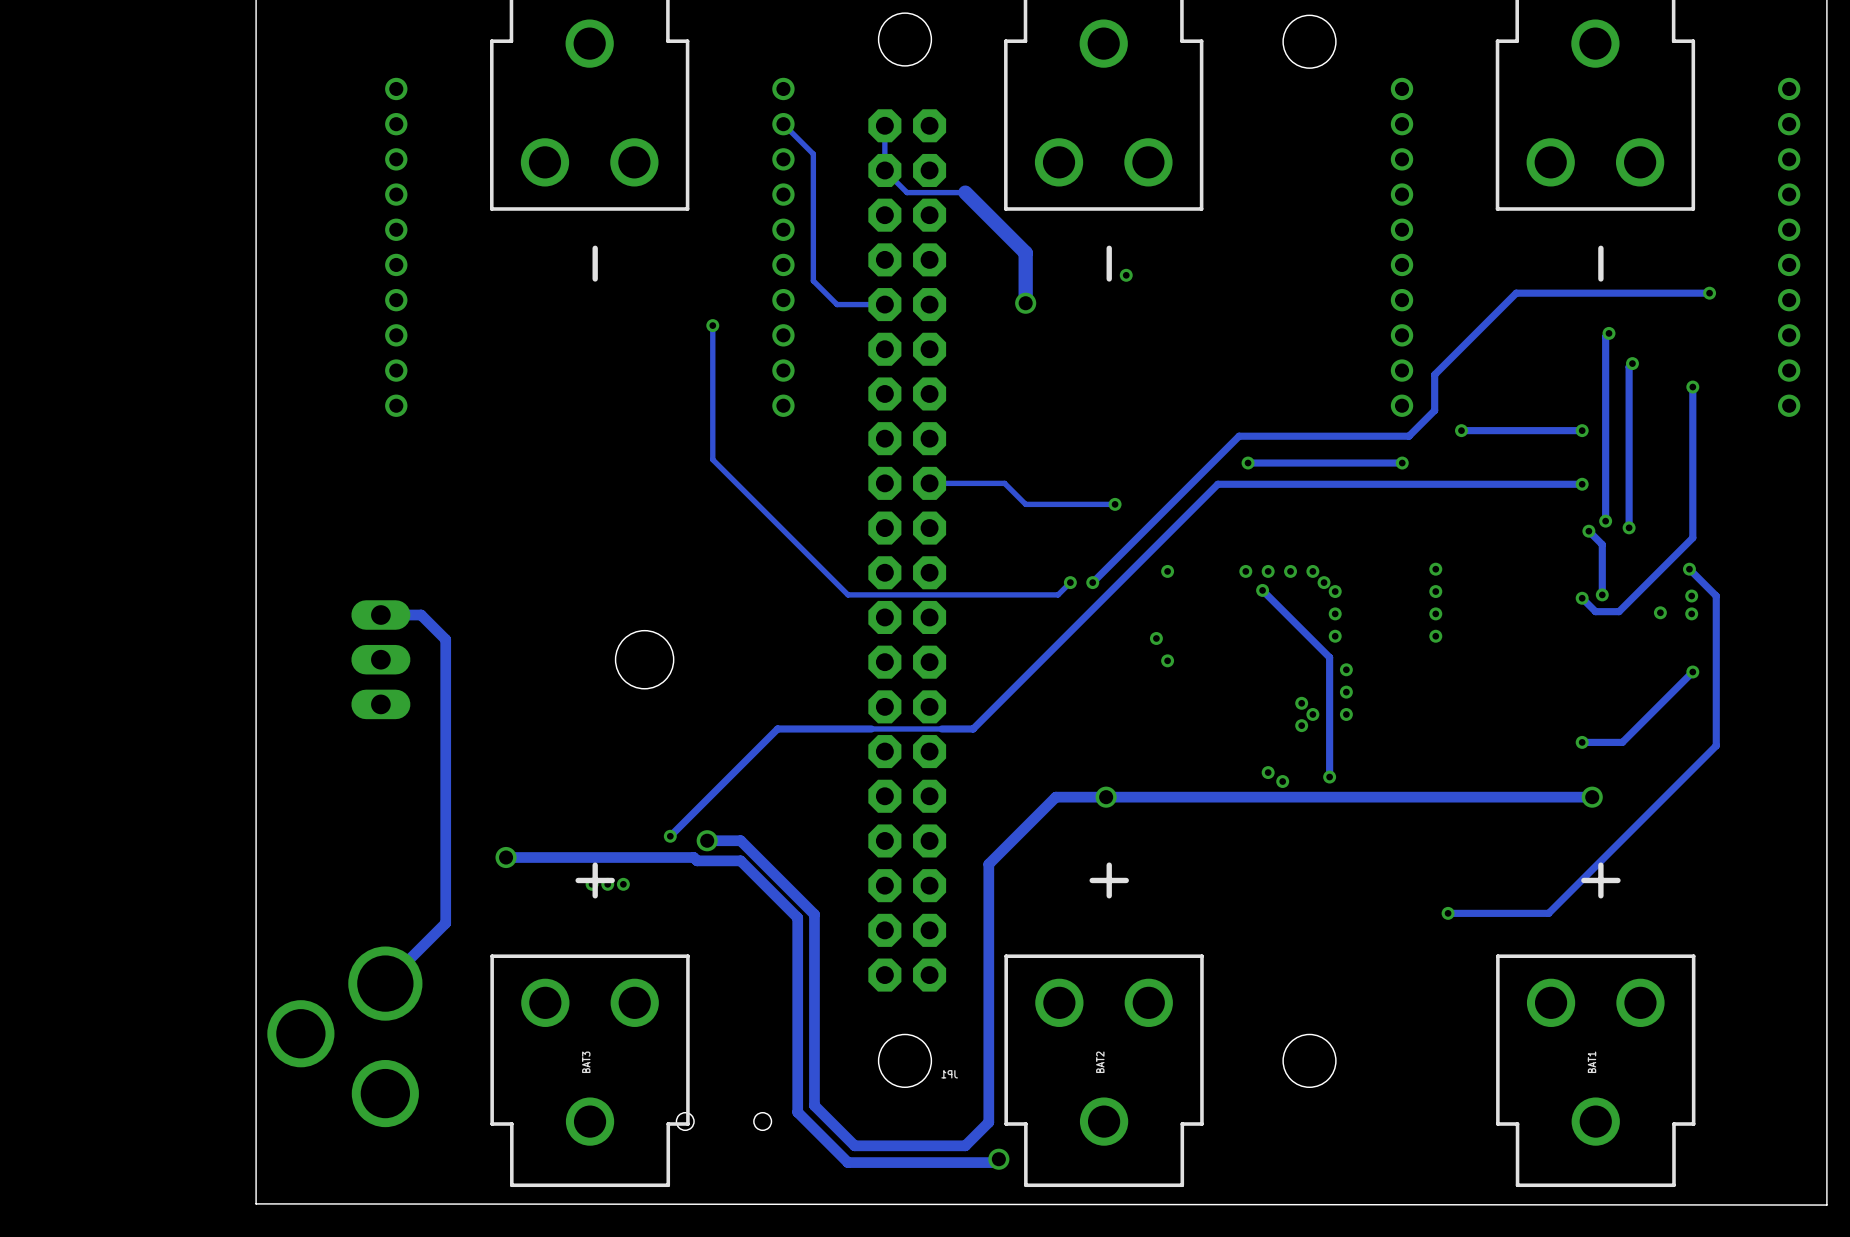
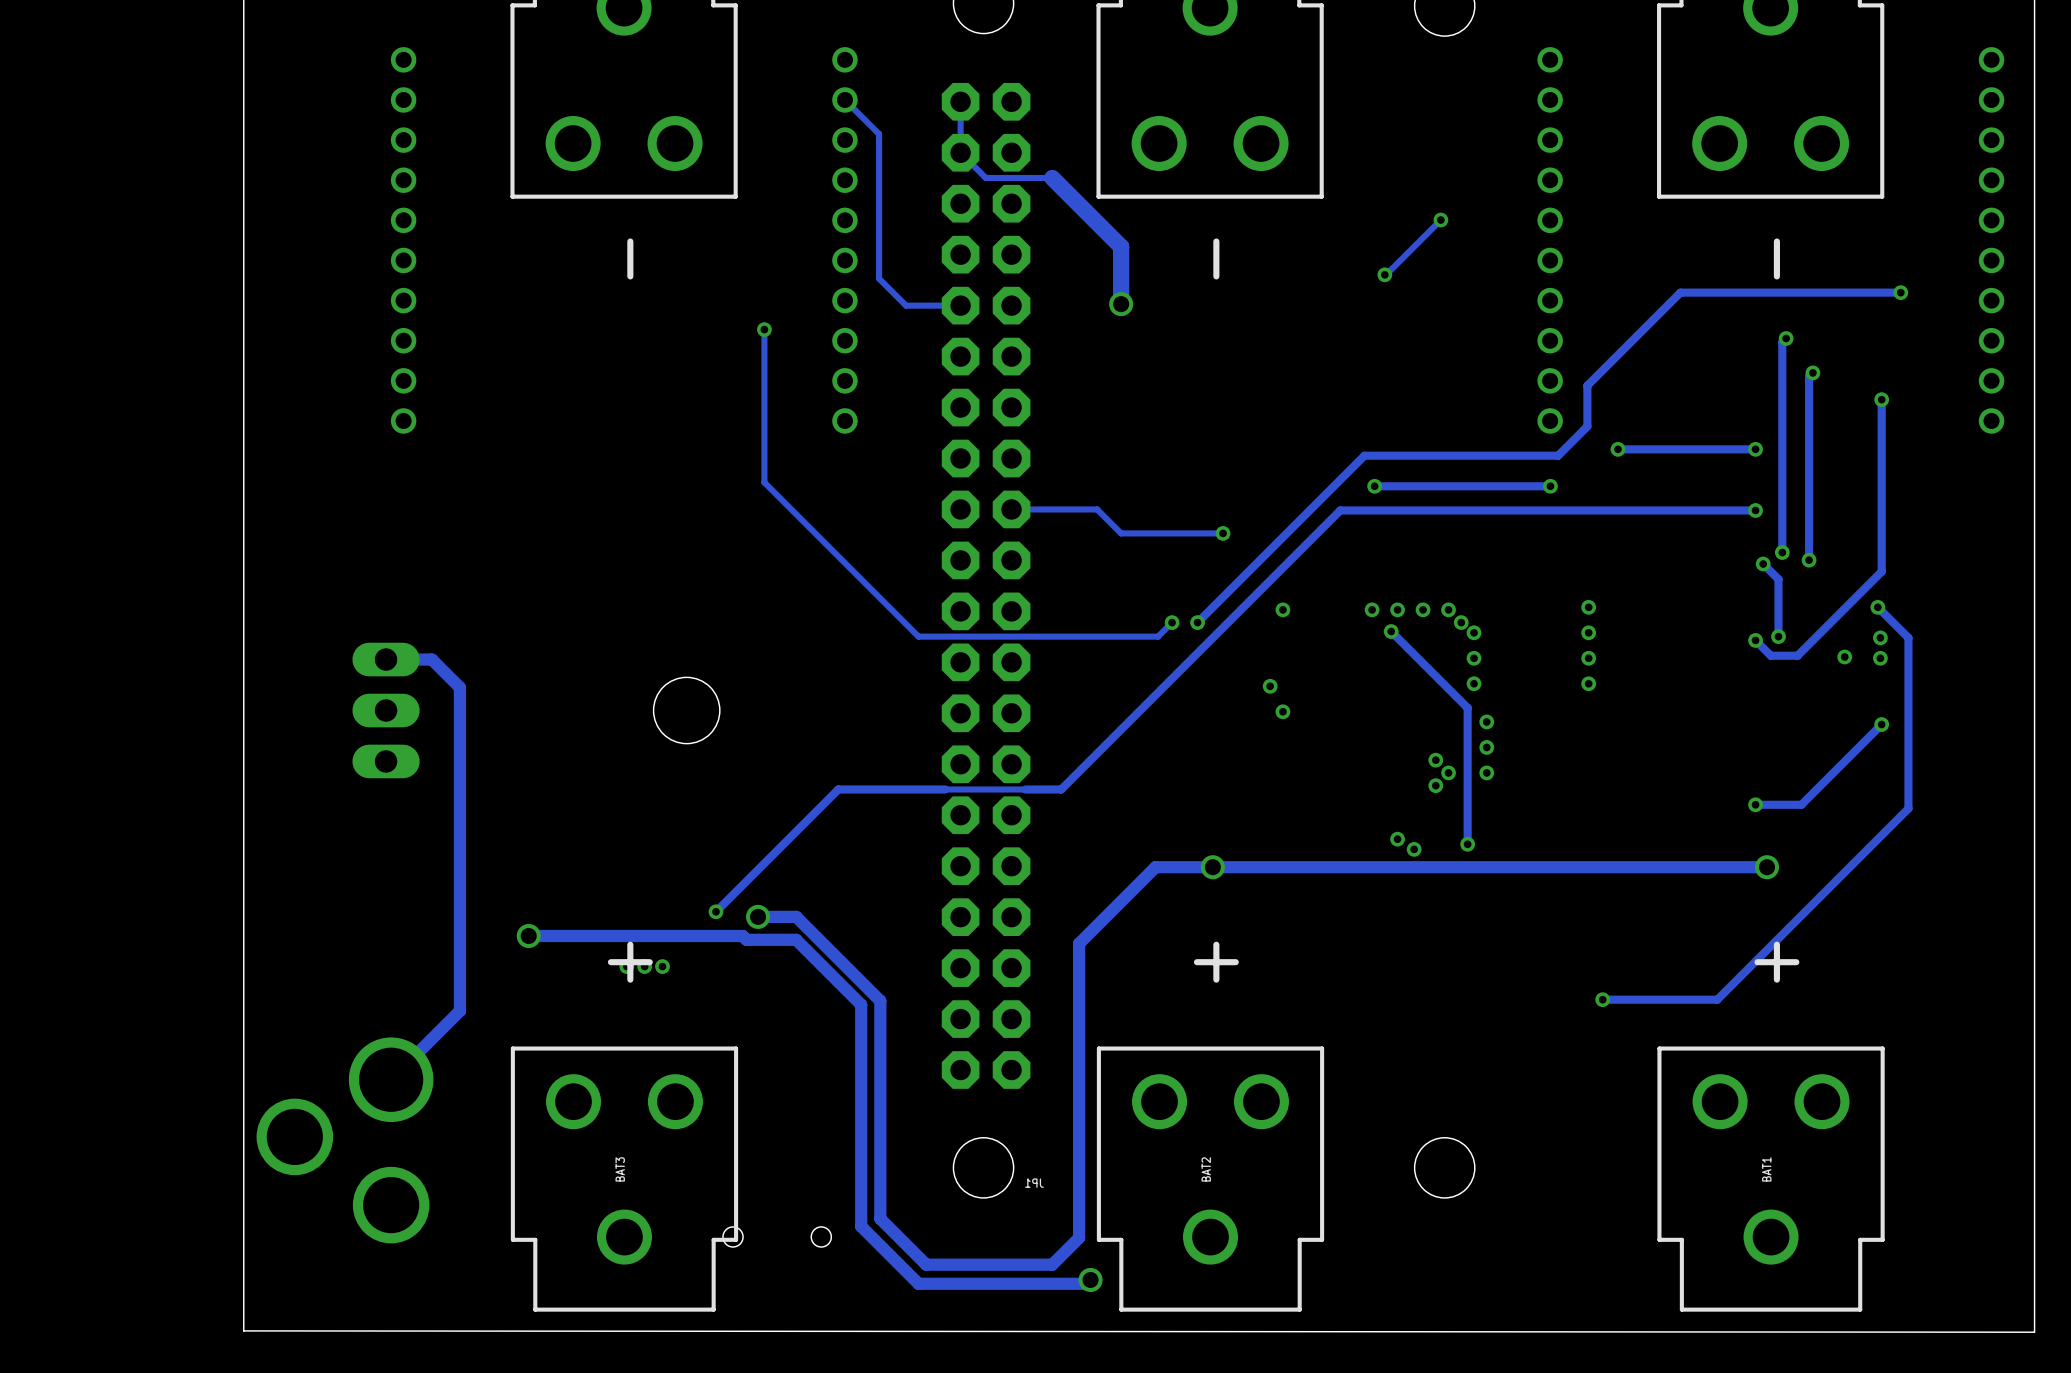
track: none -> (1440, 220) (1384, 274)
via: none -> (1440, 220)
via: (1126, 275) -> none
via: none -> (1384, 274)

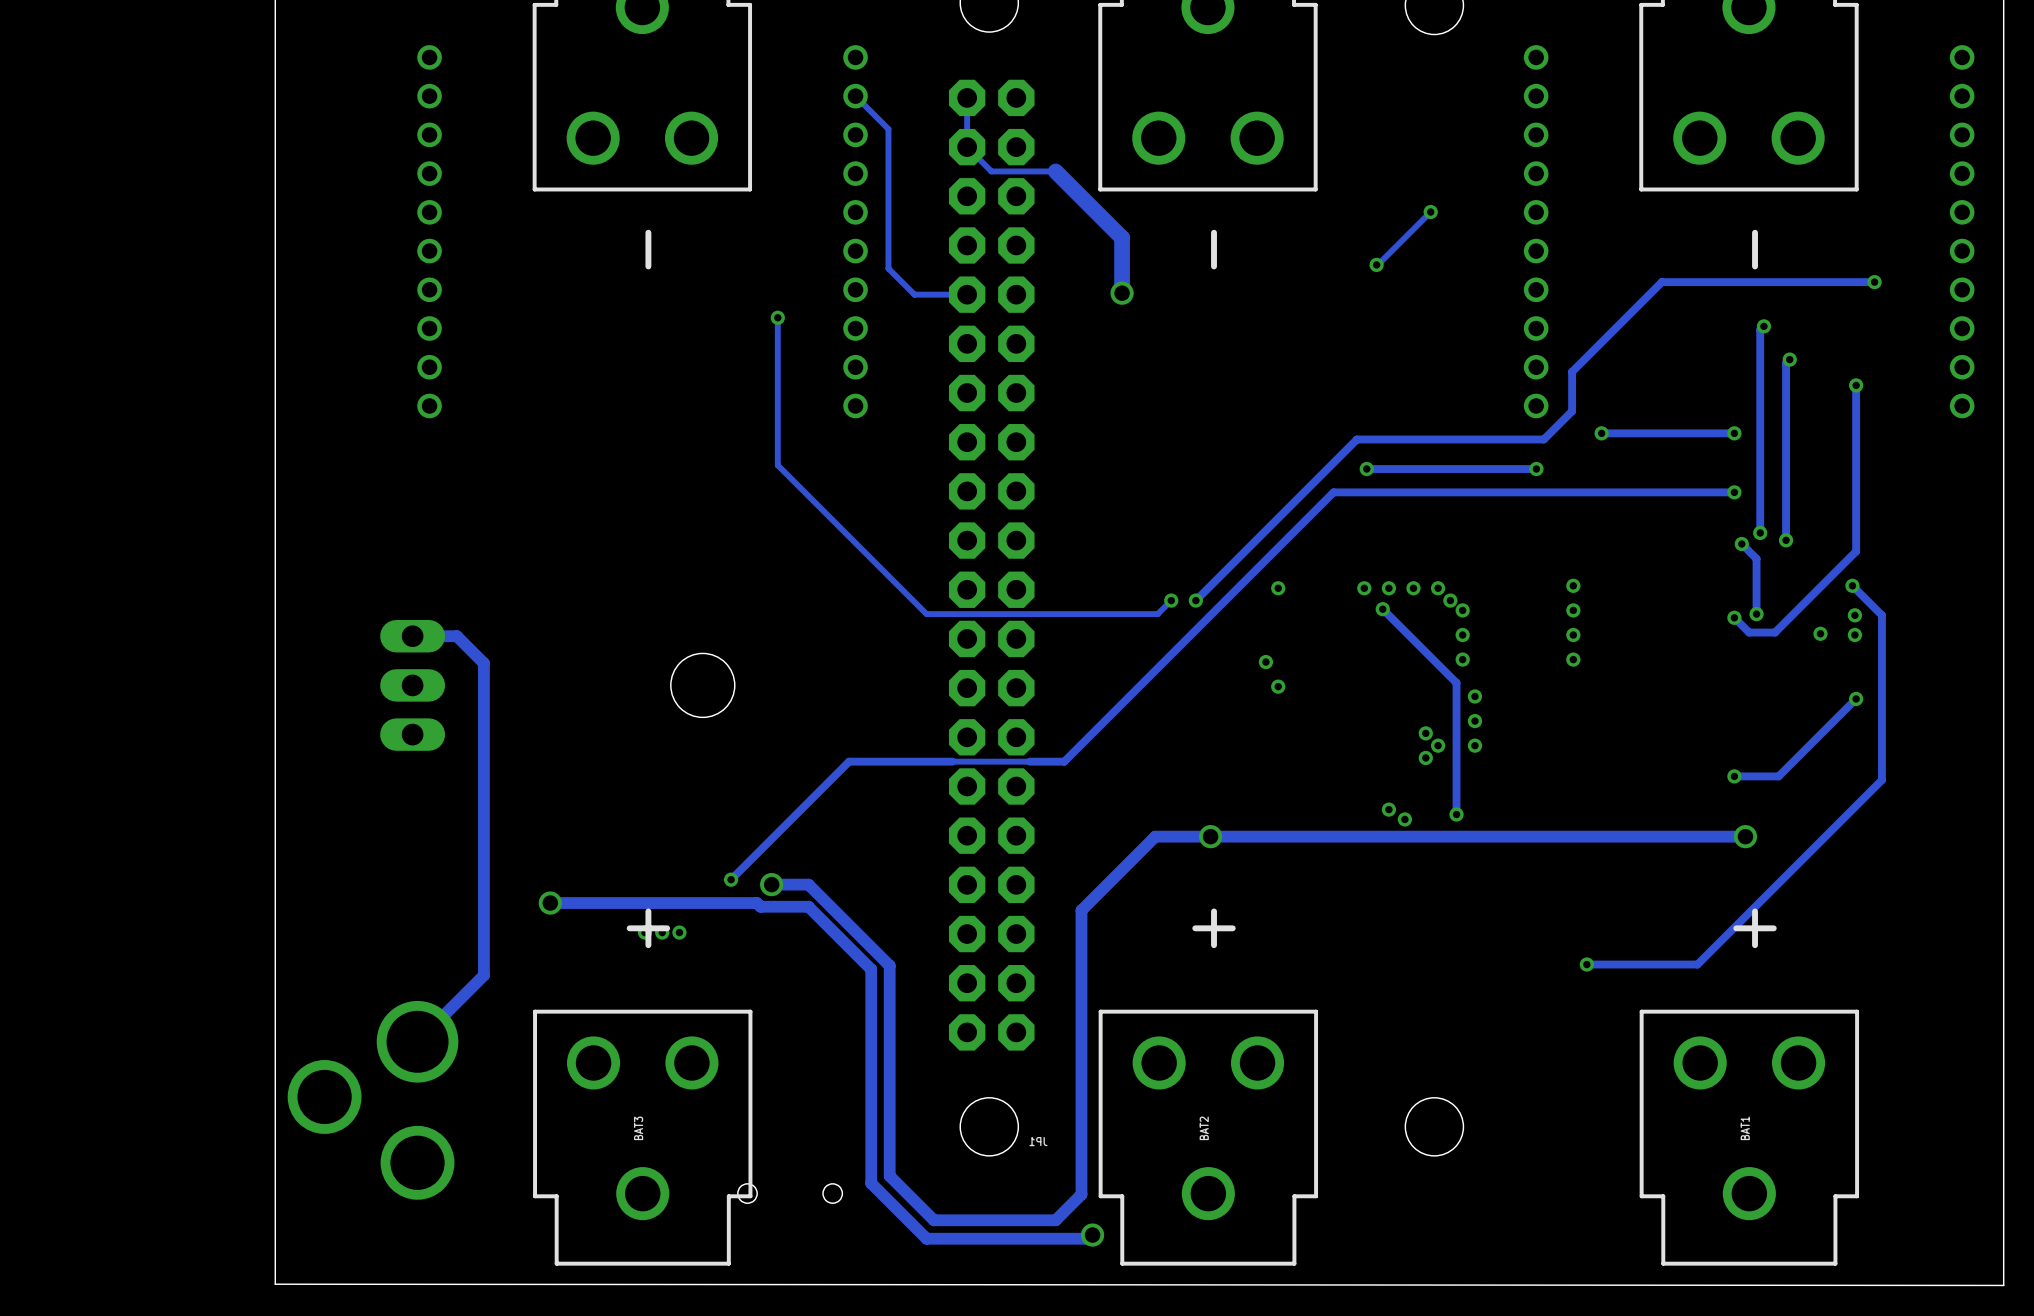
track: (1011, 509) (1097, 509) (1121, 533) (1223, 533) -> none
via: (1223, 533) -> none

